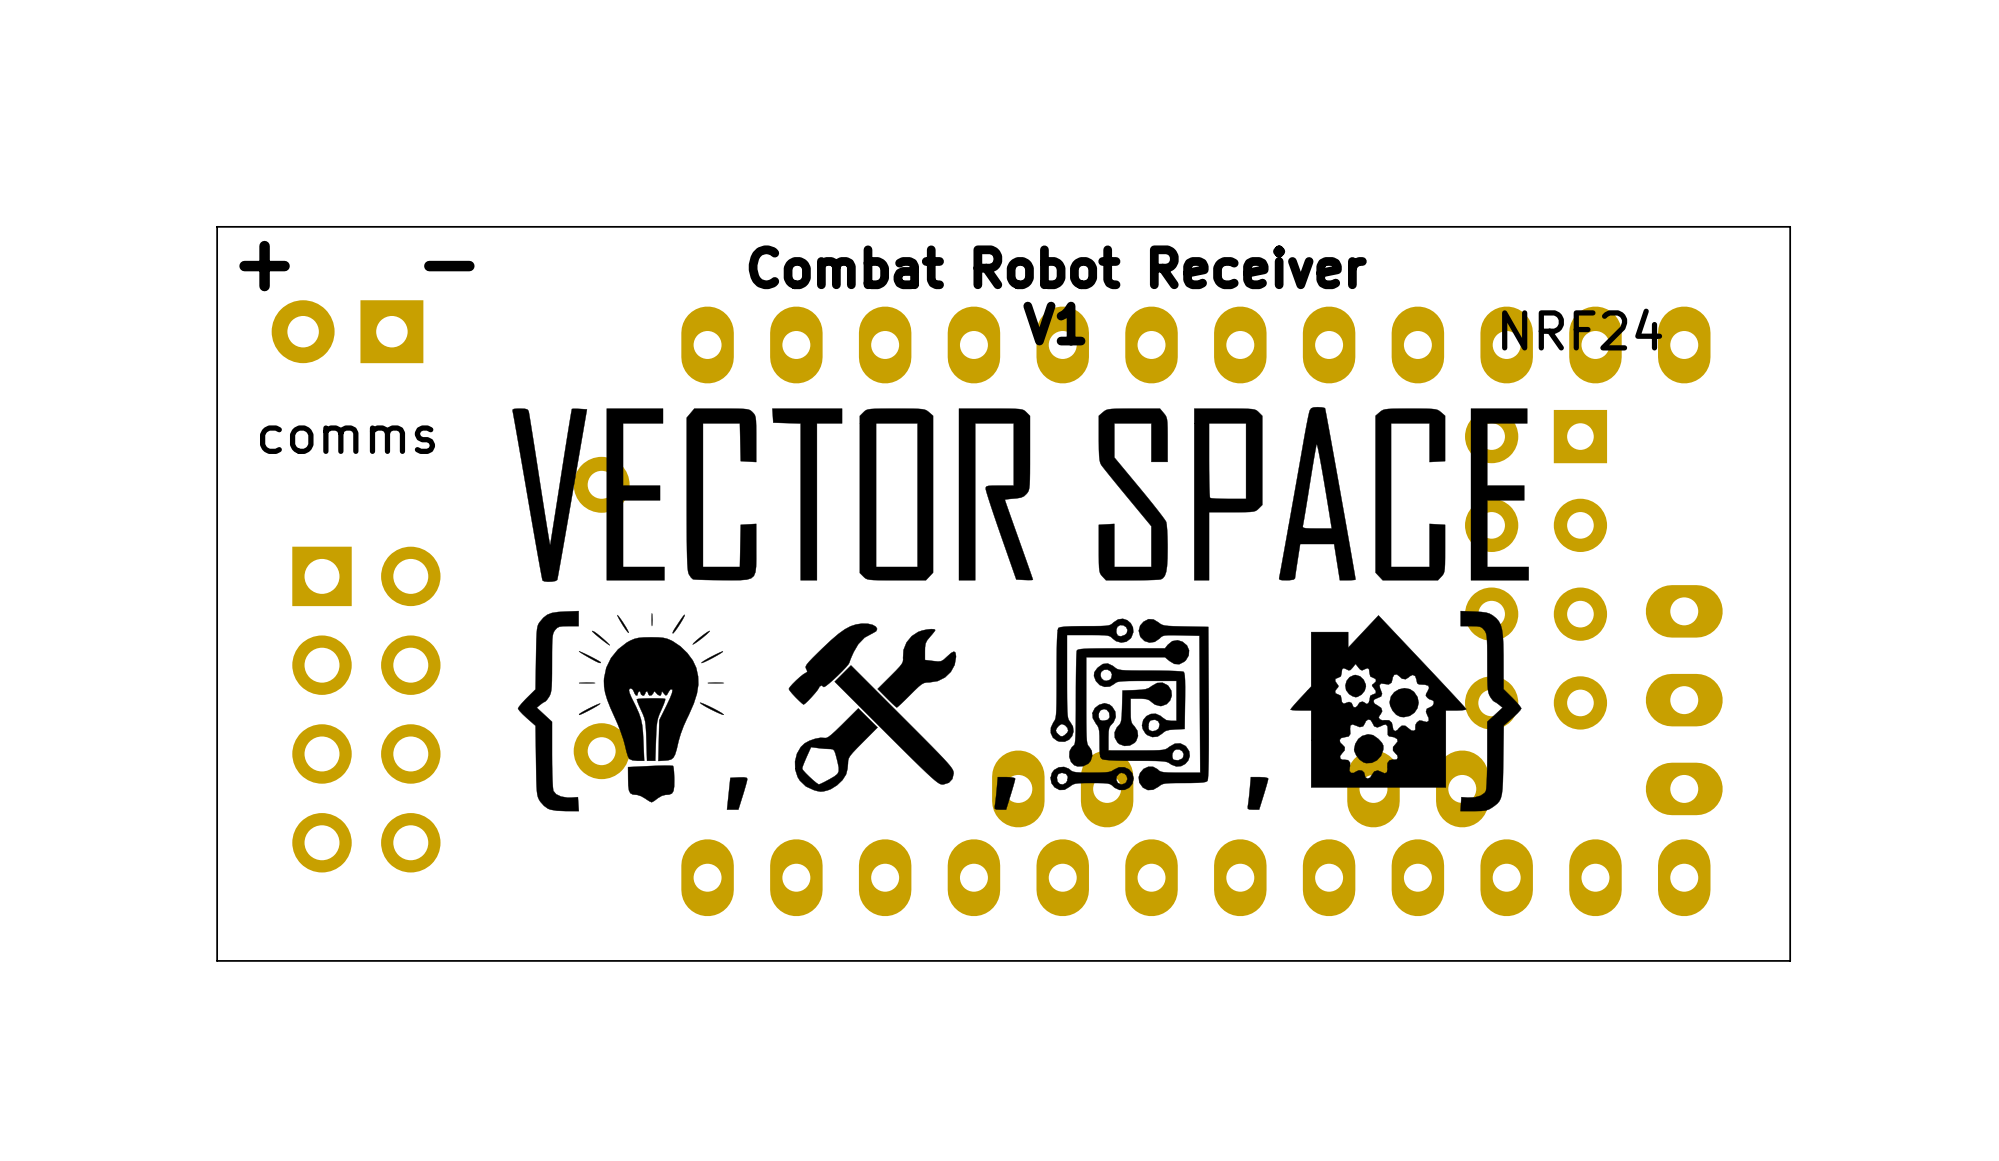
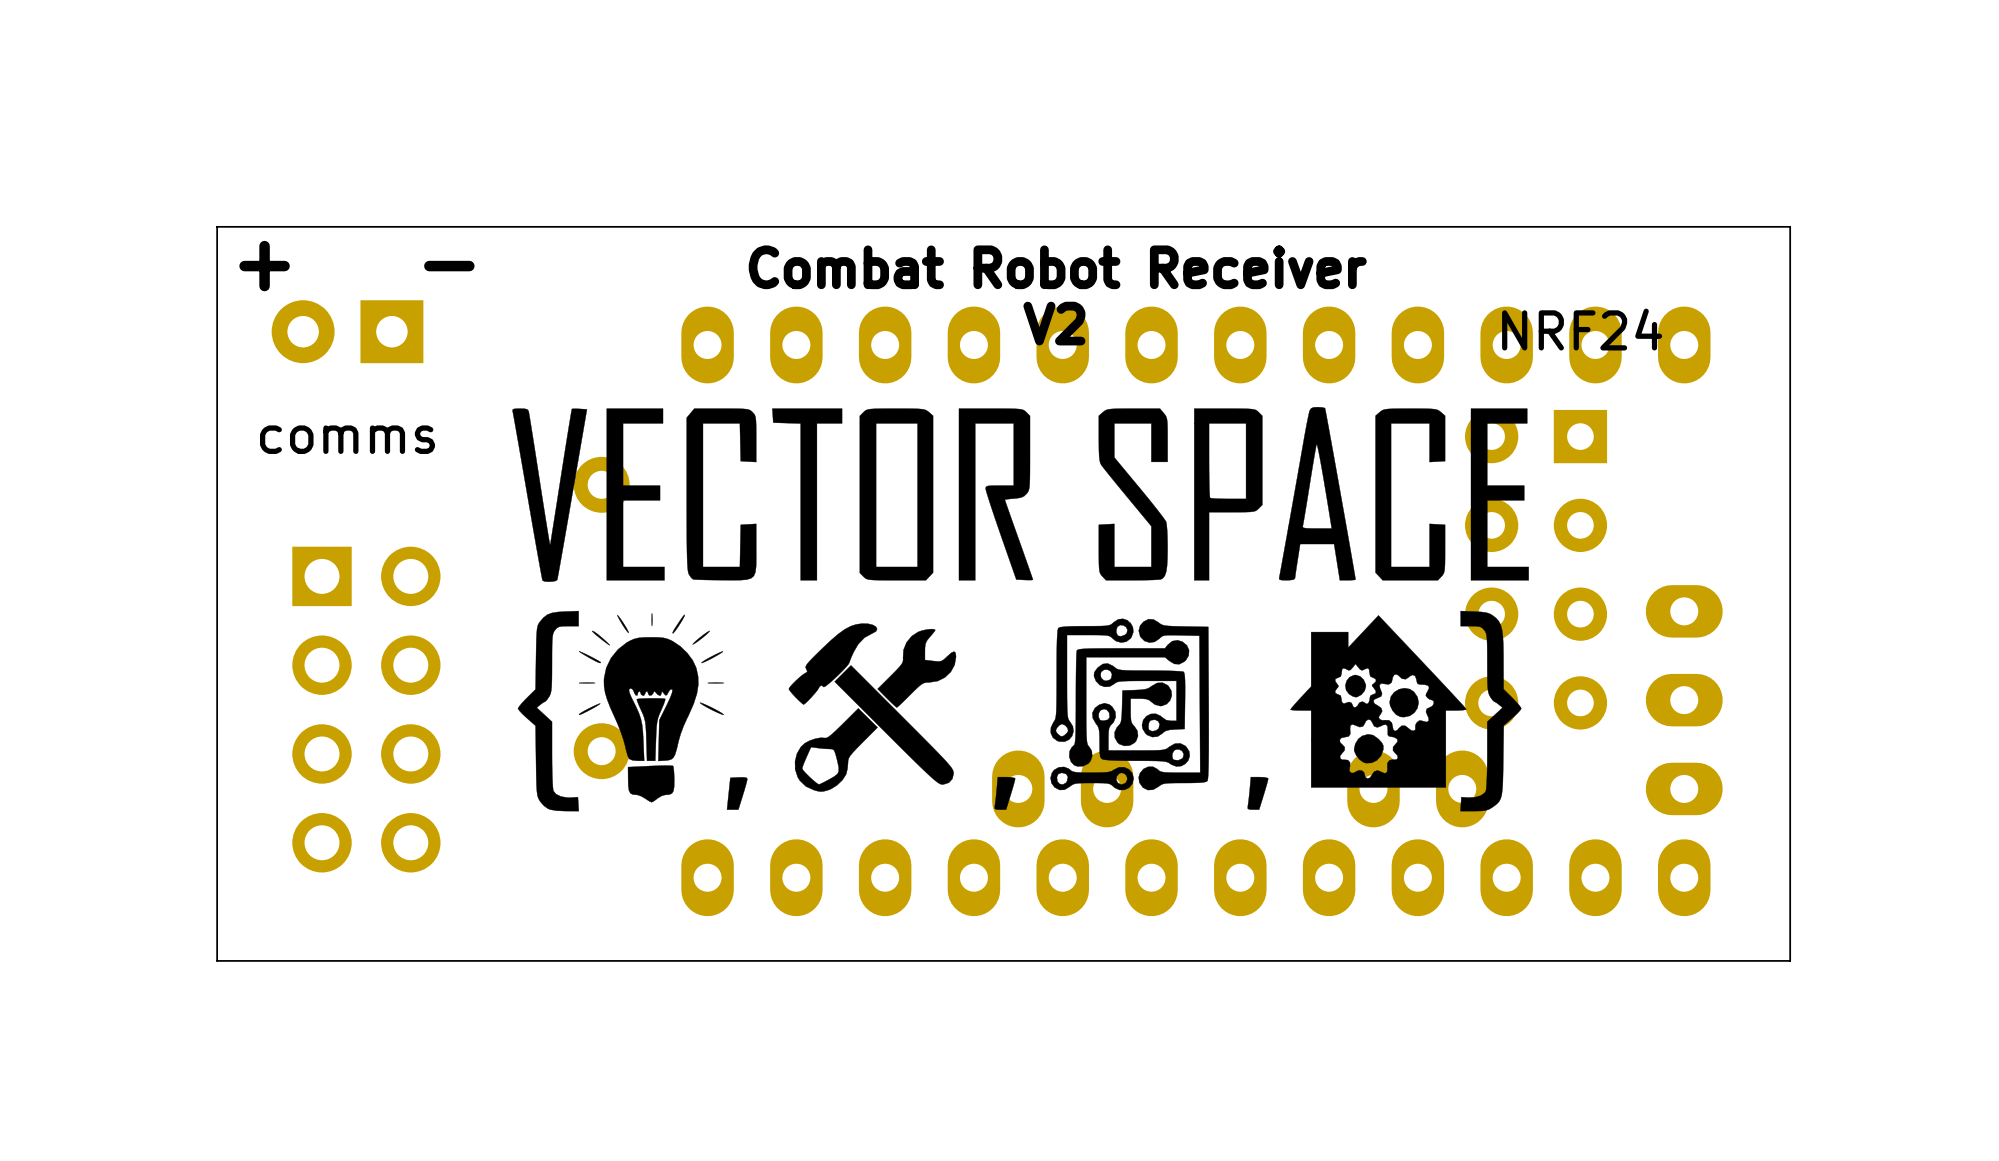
text: V1 (1054, 323) -> V2 (1054, 323)

